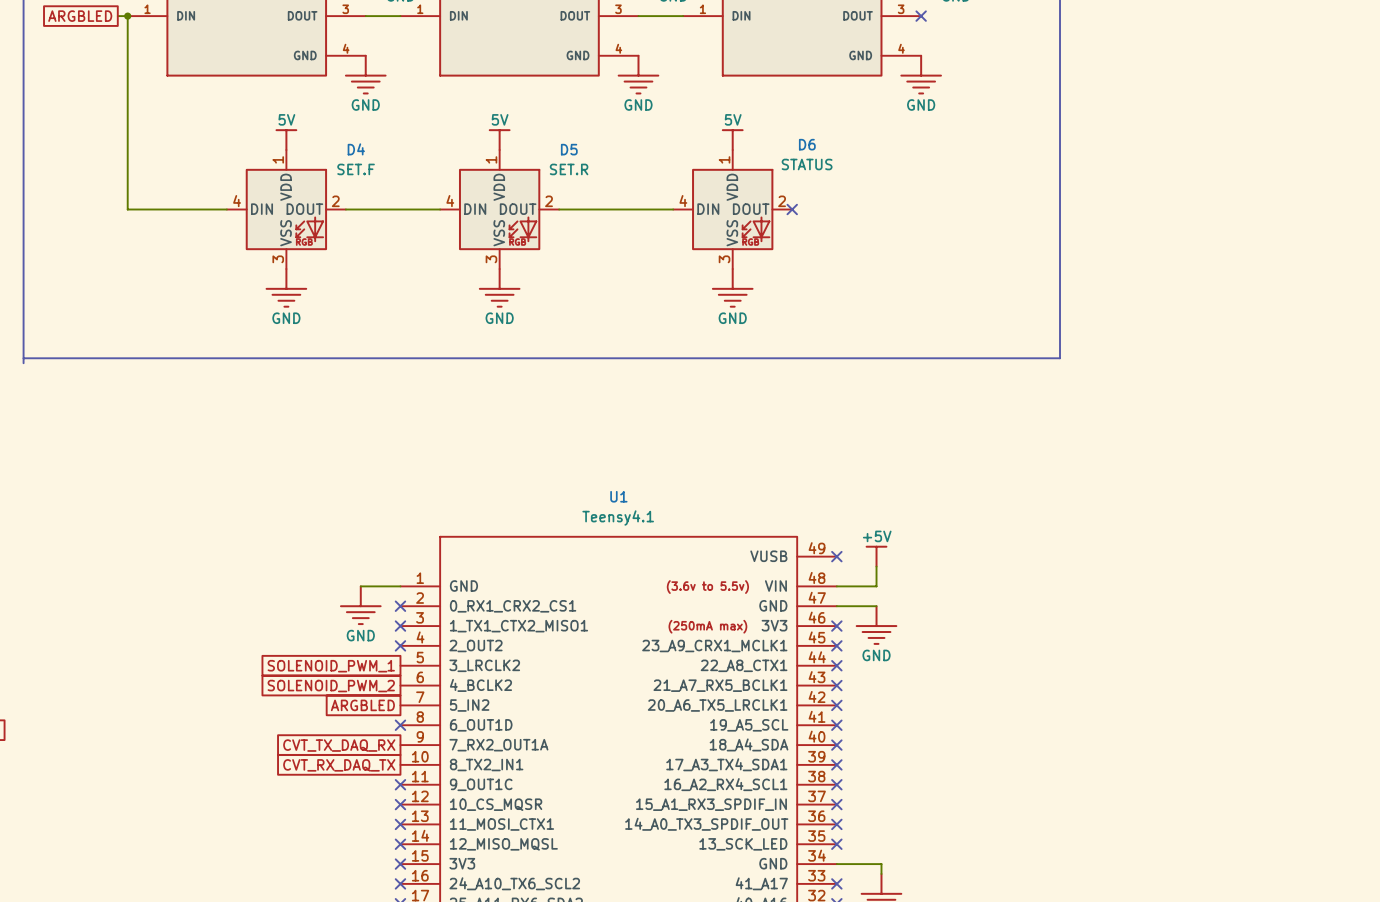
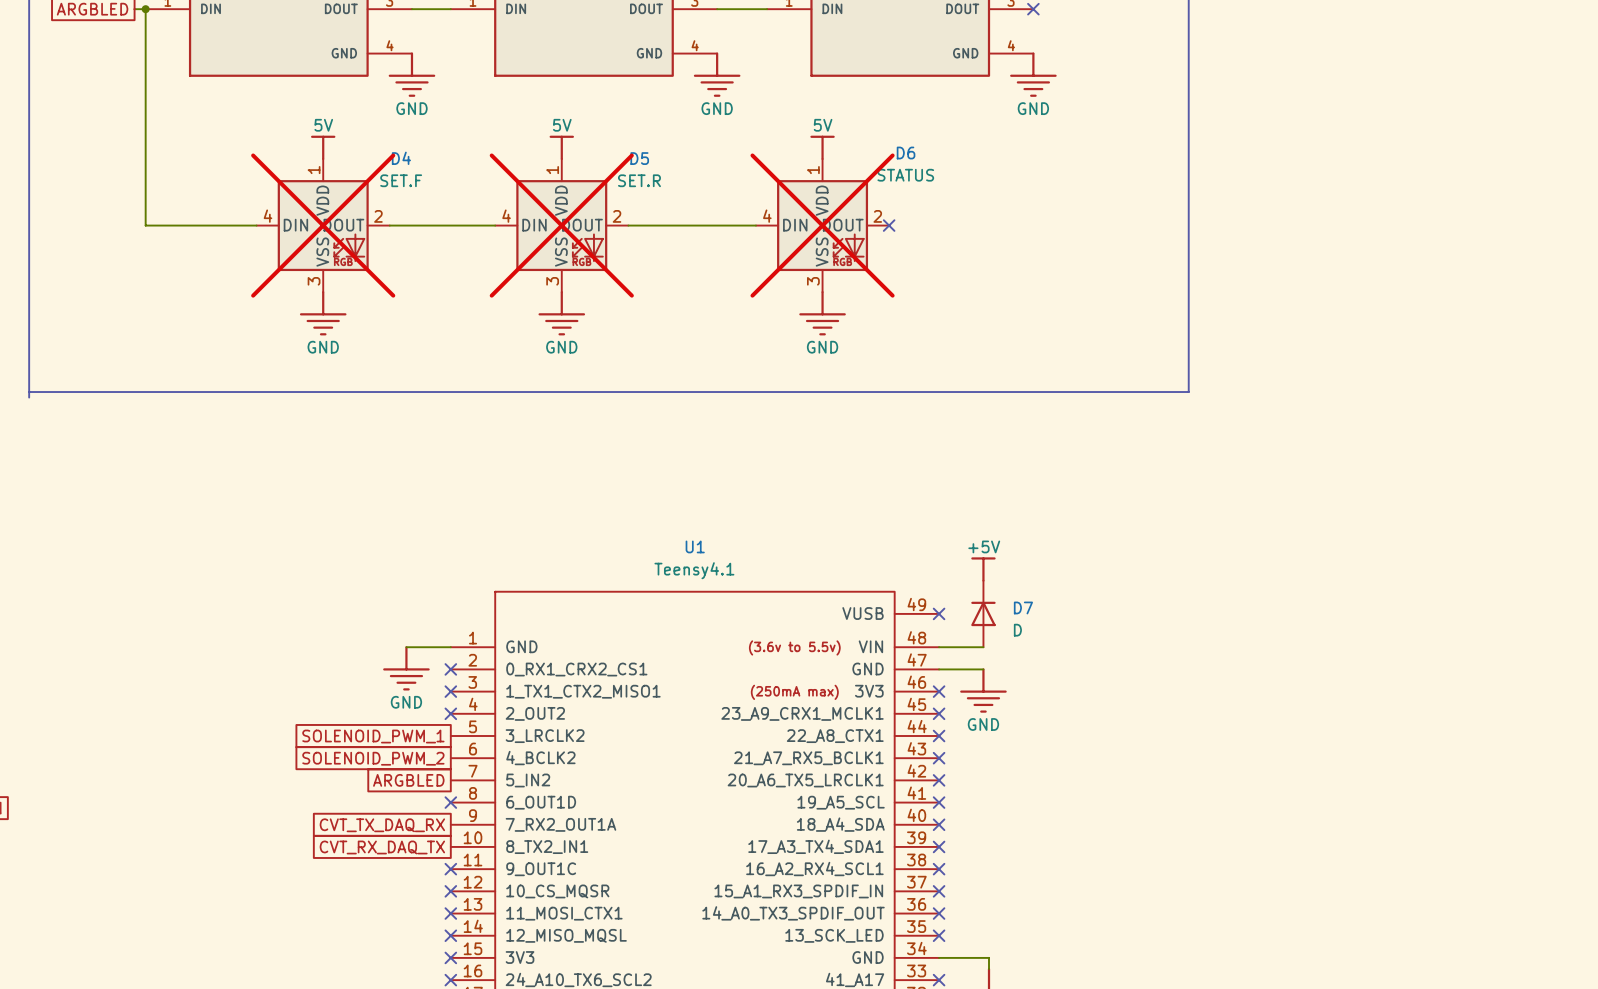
D4 do-not-place cross: none -> (323, 225)
D5 do-not-place cross: none -> (561, 225)
D6 do-not-place cross: none -> (822, 225)
D7: none -> D (983, 613)
power symbol position: +5V (876, 556) -> +5V (983, 569)

